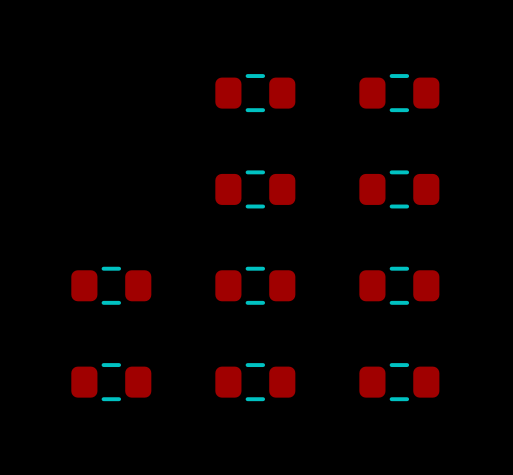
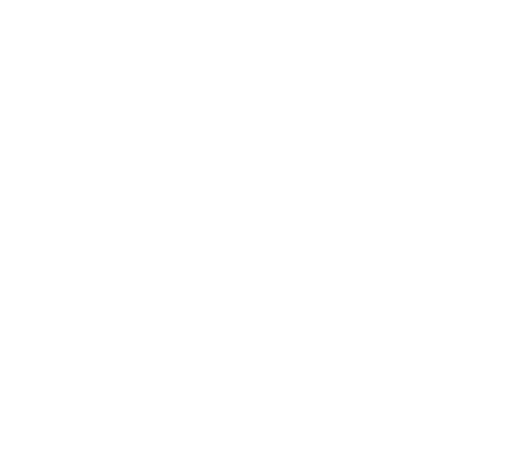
part: (255, 93) -> none
part: (399, 93) -> none
part: (255, 189) -> none
part: (399, 189) -> none
part: (111, 285) -> none
part: (255, 285) -> none
part: (399, 285) -> none
part: (111, 382) -> none
part: (255, 382) -> none
part: (399, 382) -> none

